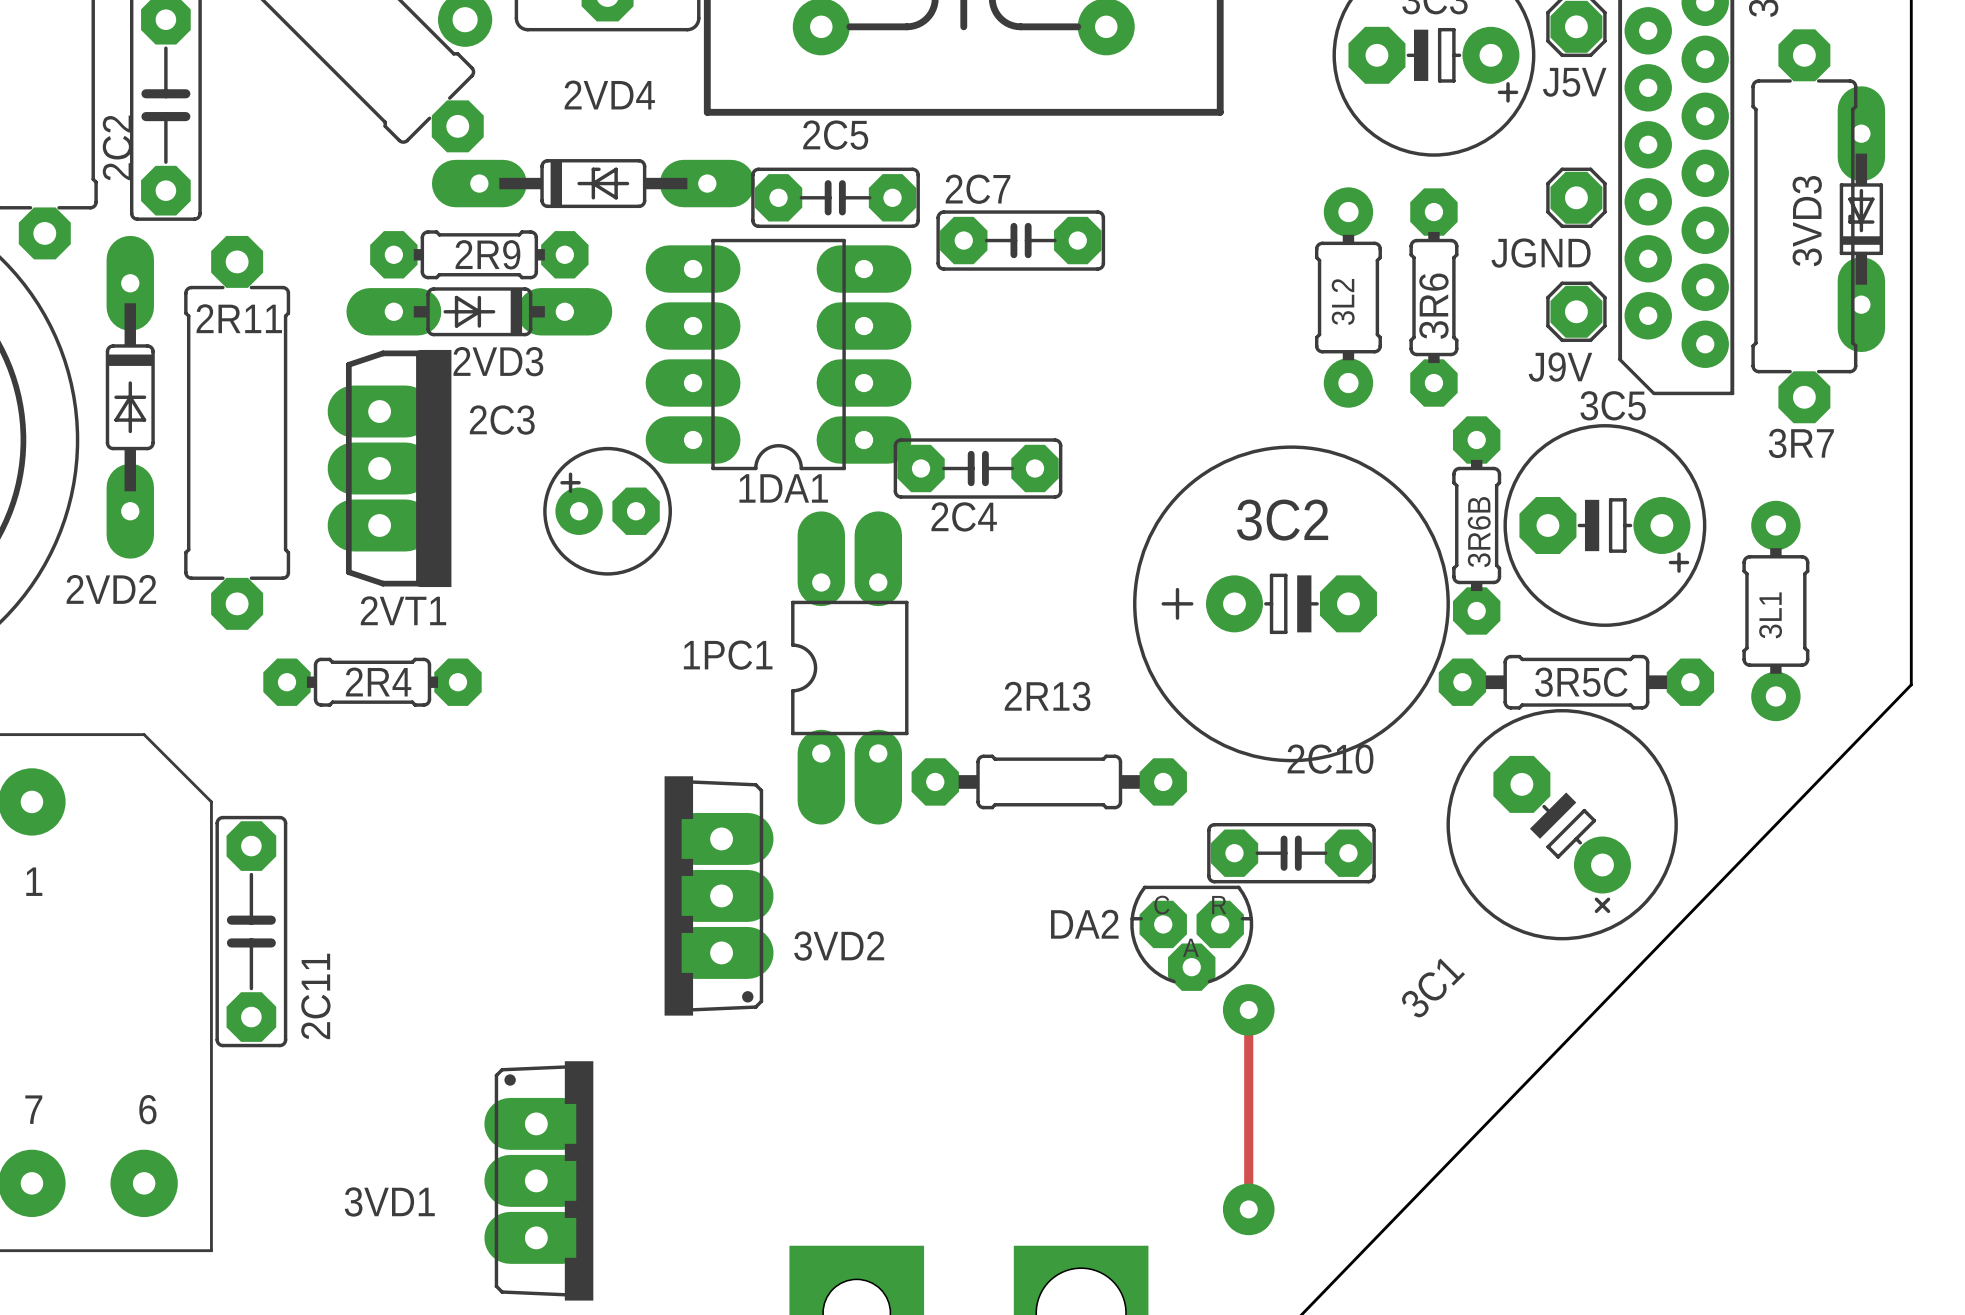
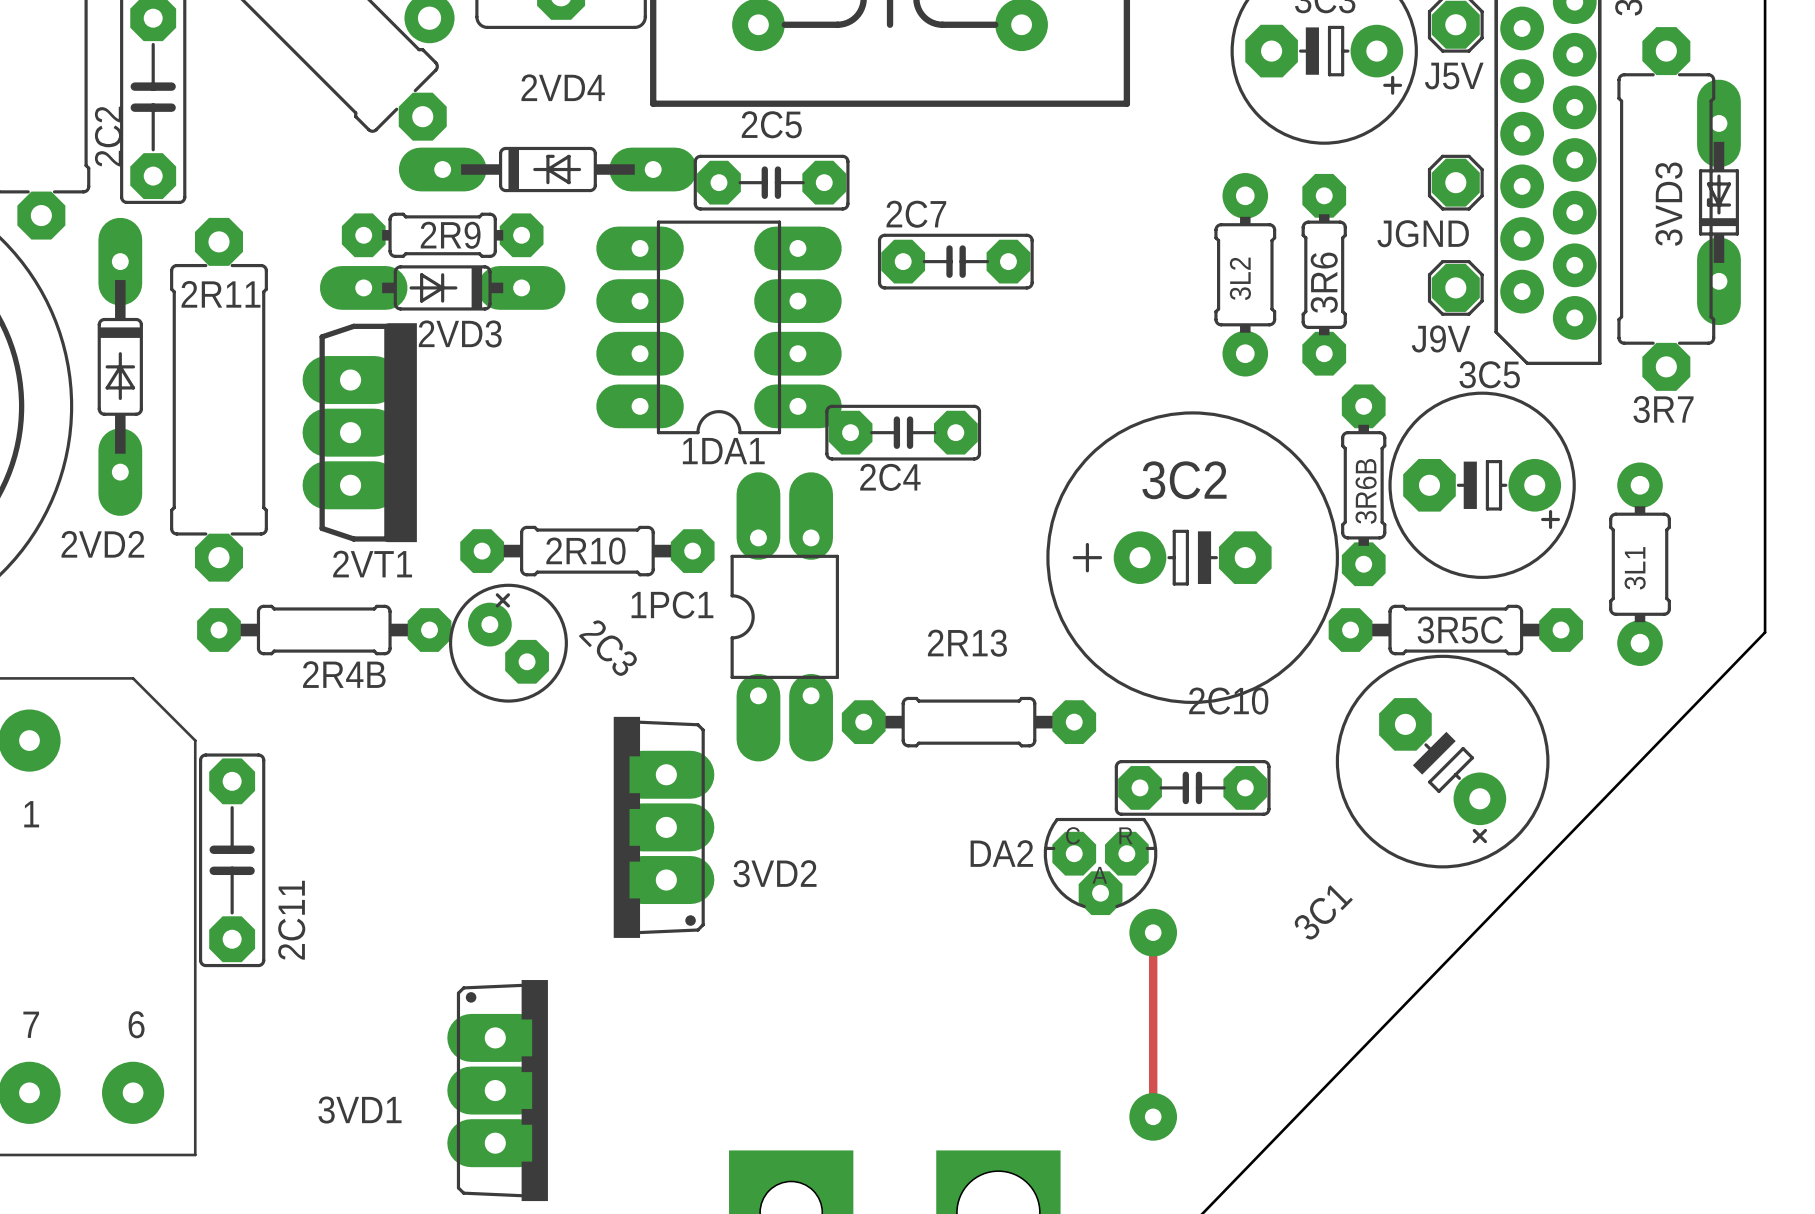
2C7 position: (1020, 240) -> (955, 261)
2C3 name position: 2C3 (502, 420) -> 2C3 (607, 648)
2C3 rotation: 0° (607, 511) -> 45° clockwise (508, 643)
2C3 position: (607, 511) -> (508, 643)
2R10: none -> (587, 551)
2R4B: none -> (324, 630)
2R4: (372, 682) -> none

